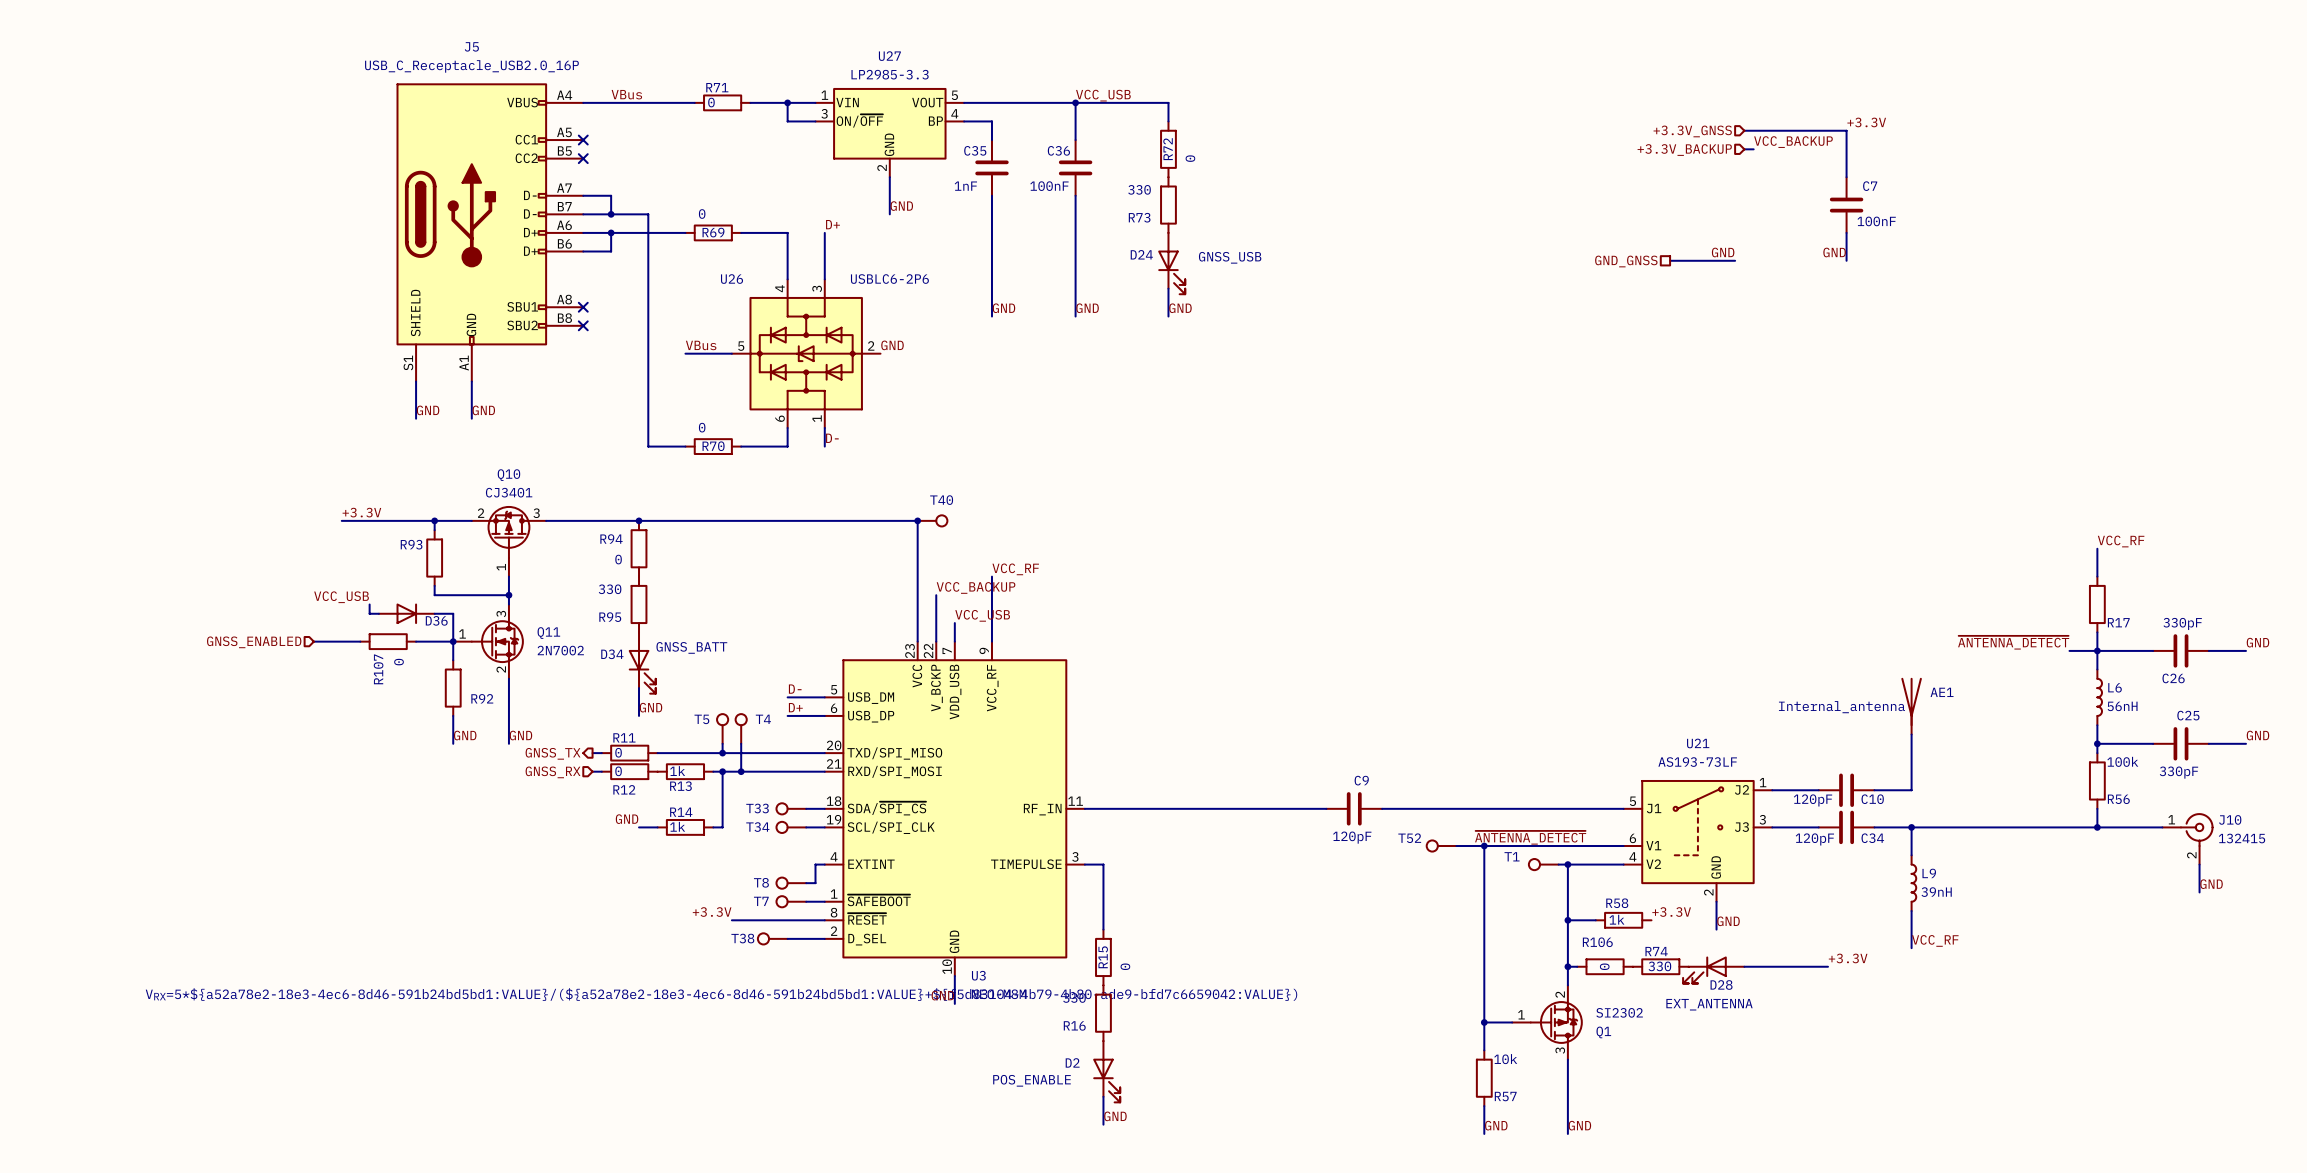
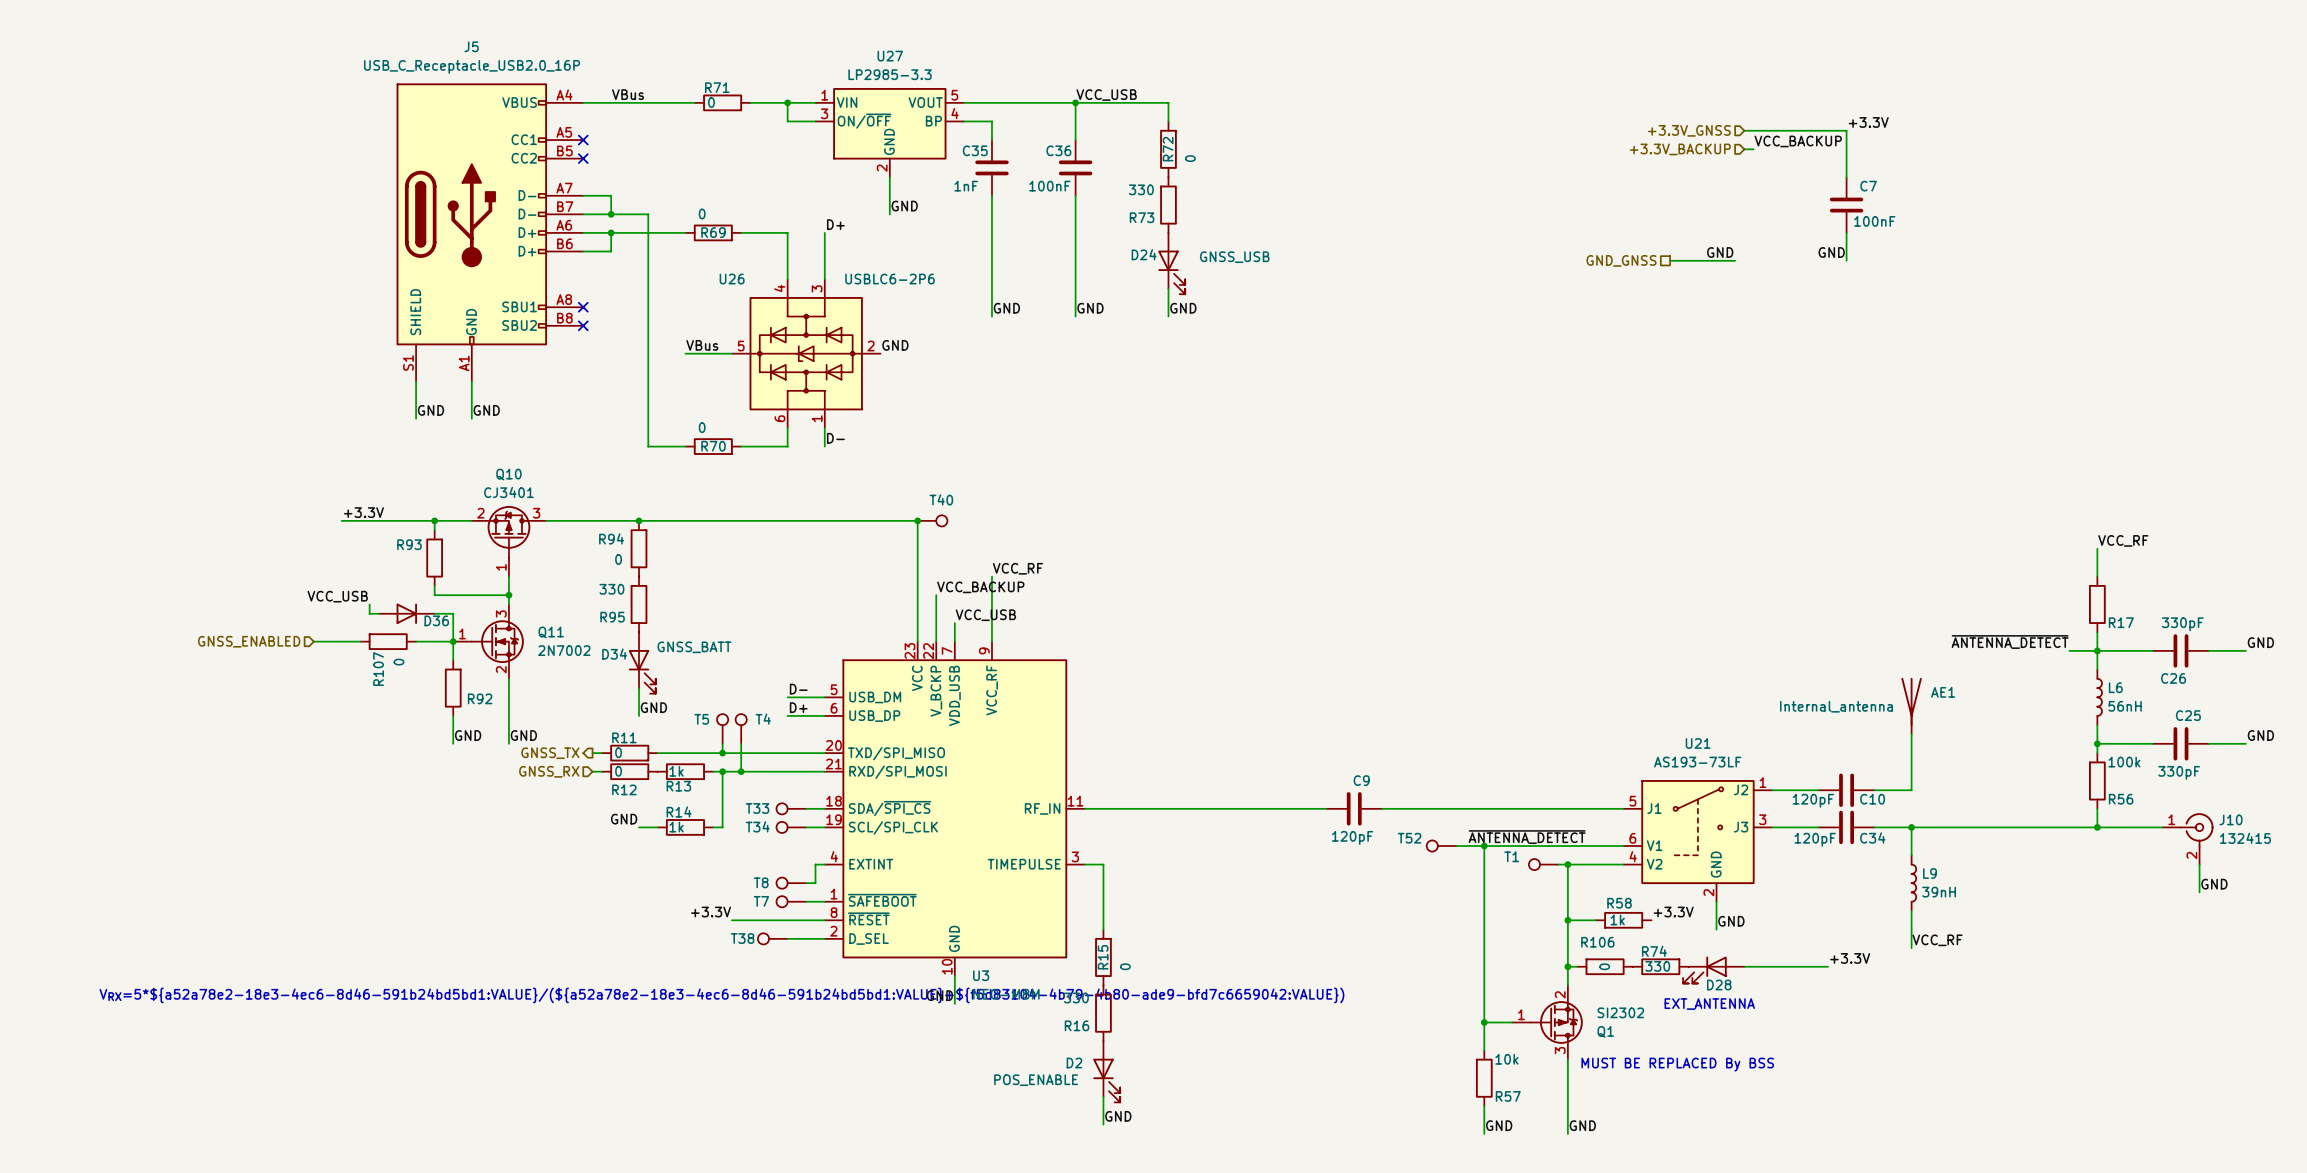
text: none -> MUST BE REPLACED By BSS (1677, 1064)

